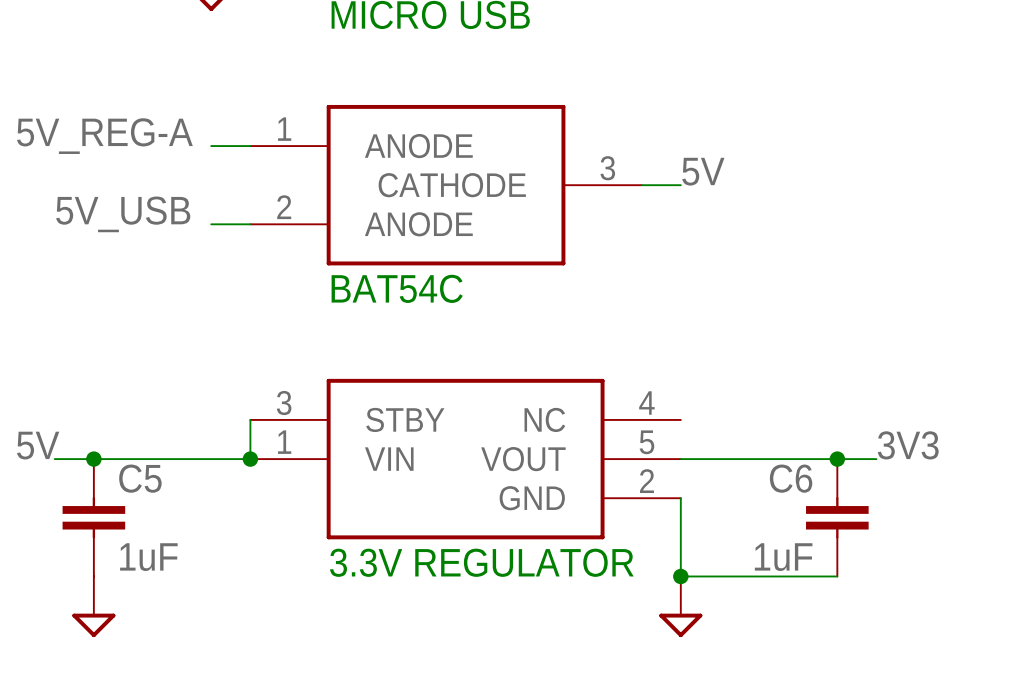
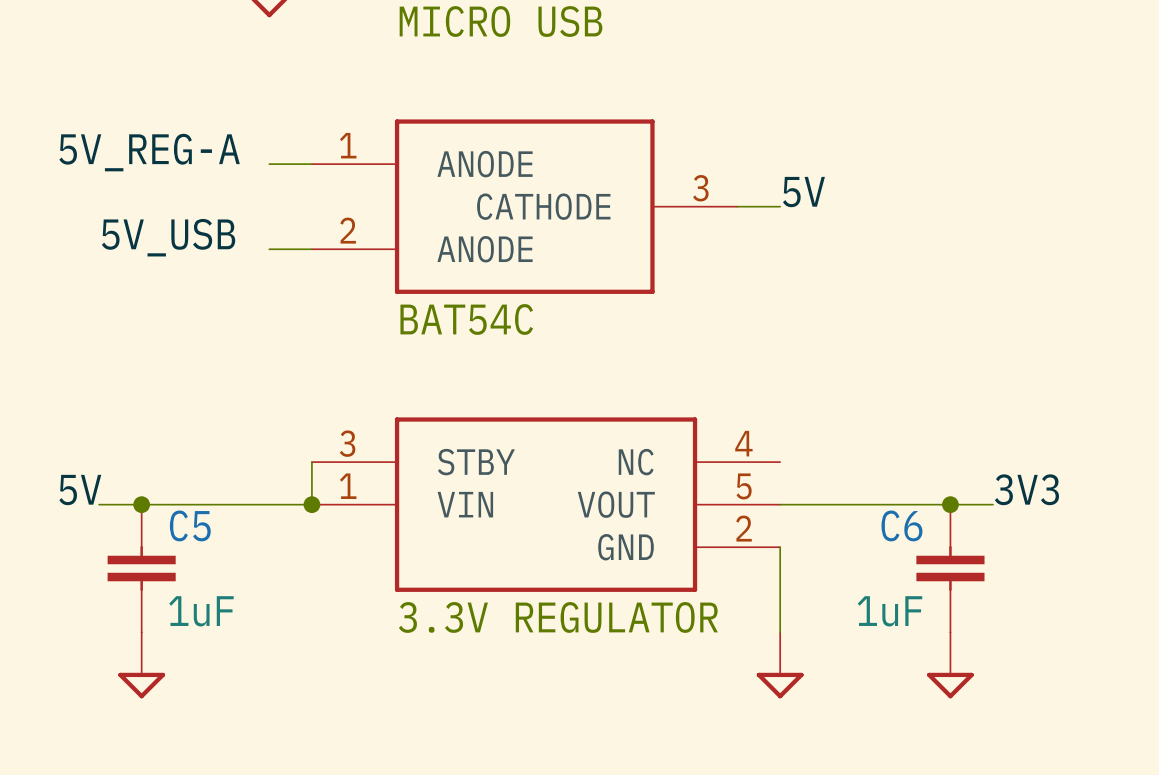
wire: (680, 576) (837, 576) -> none
junction: (680, 576) -> none
power symbol: none -> (950, 665)

